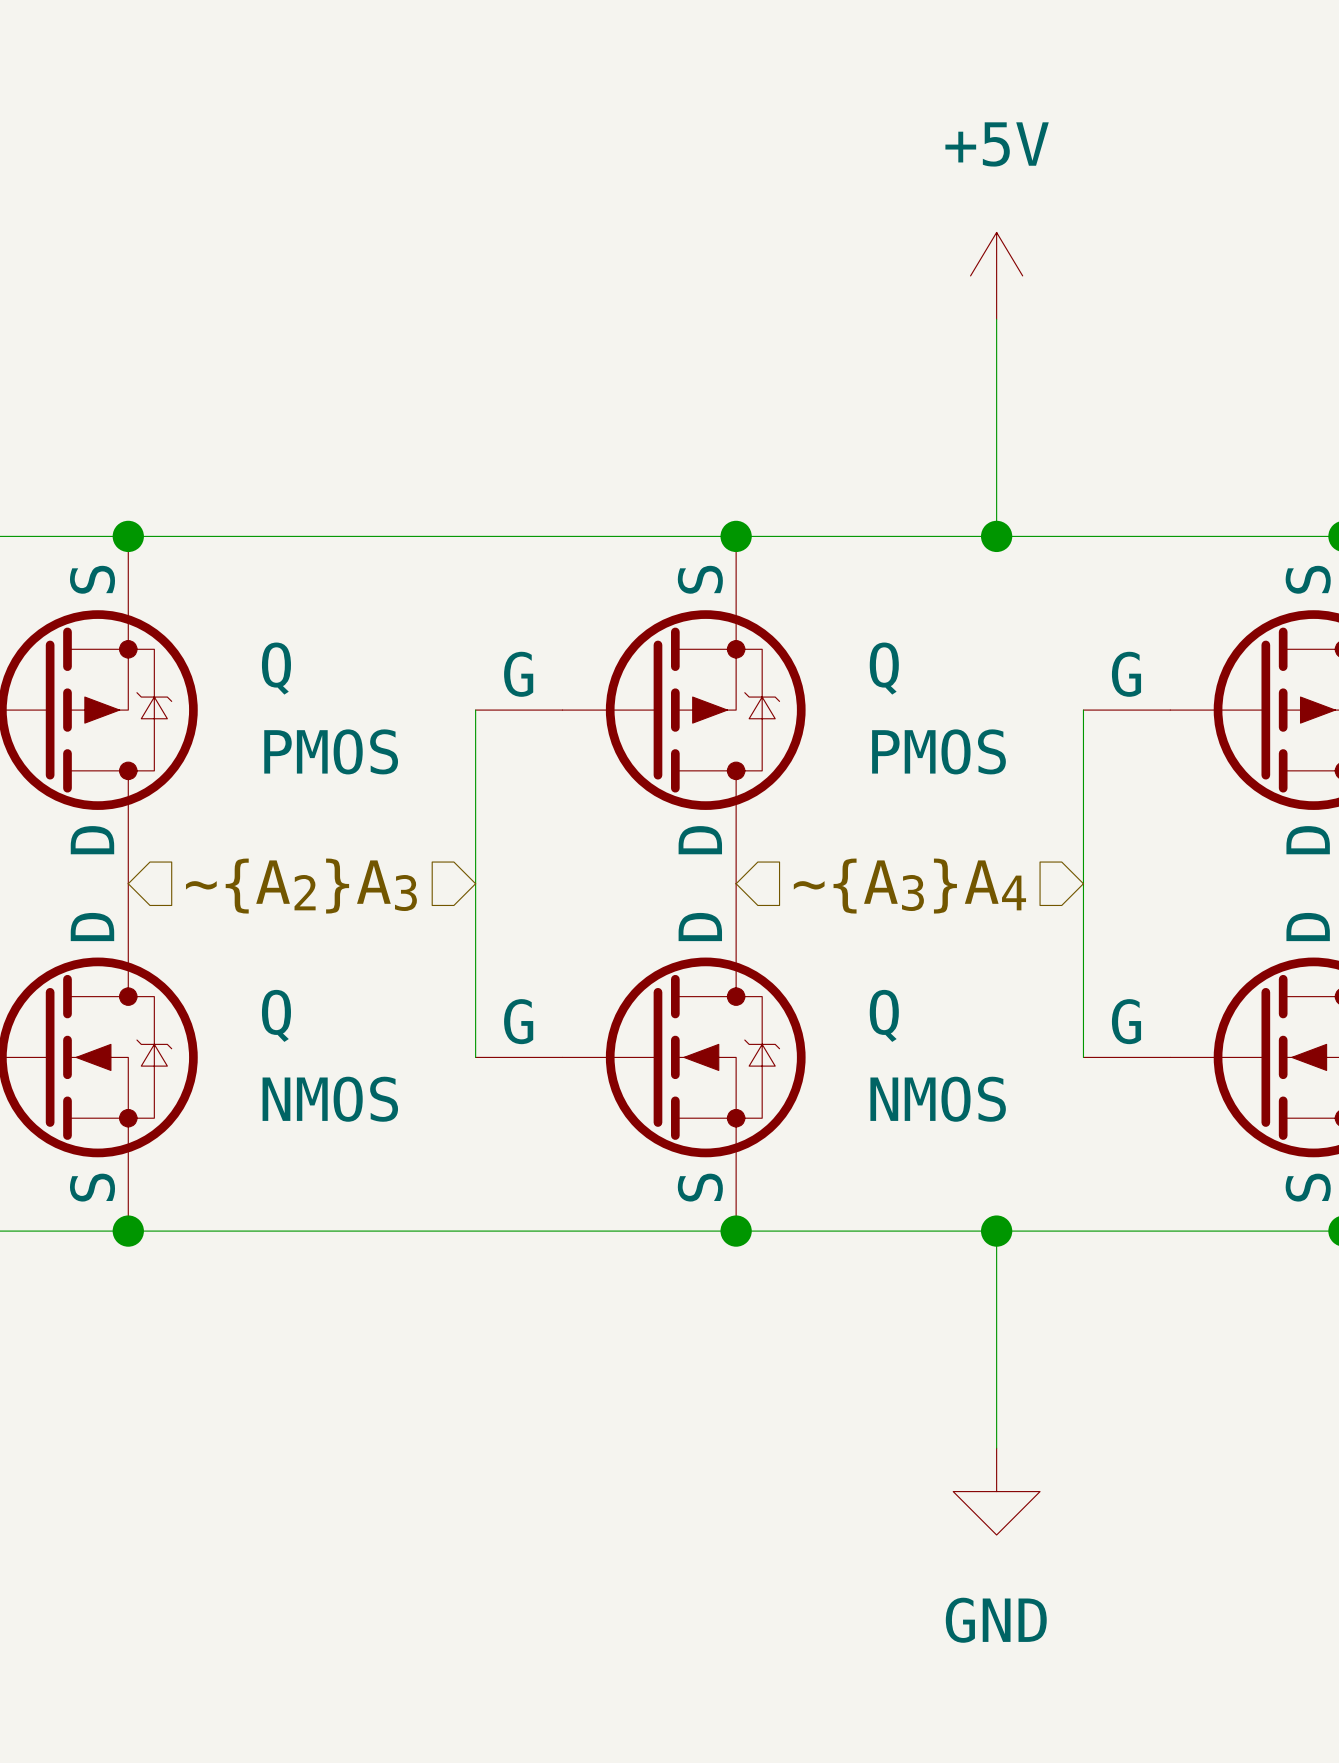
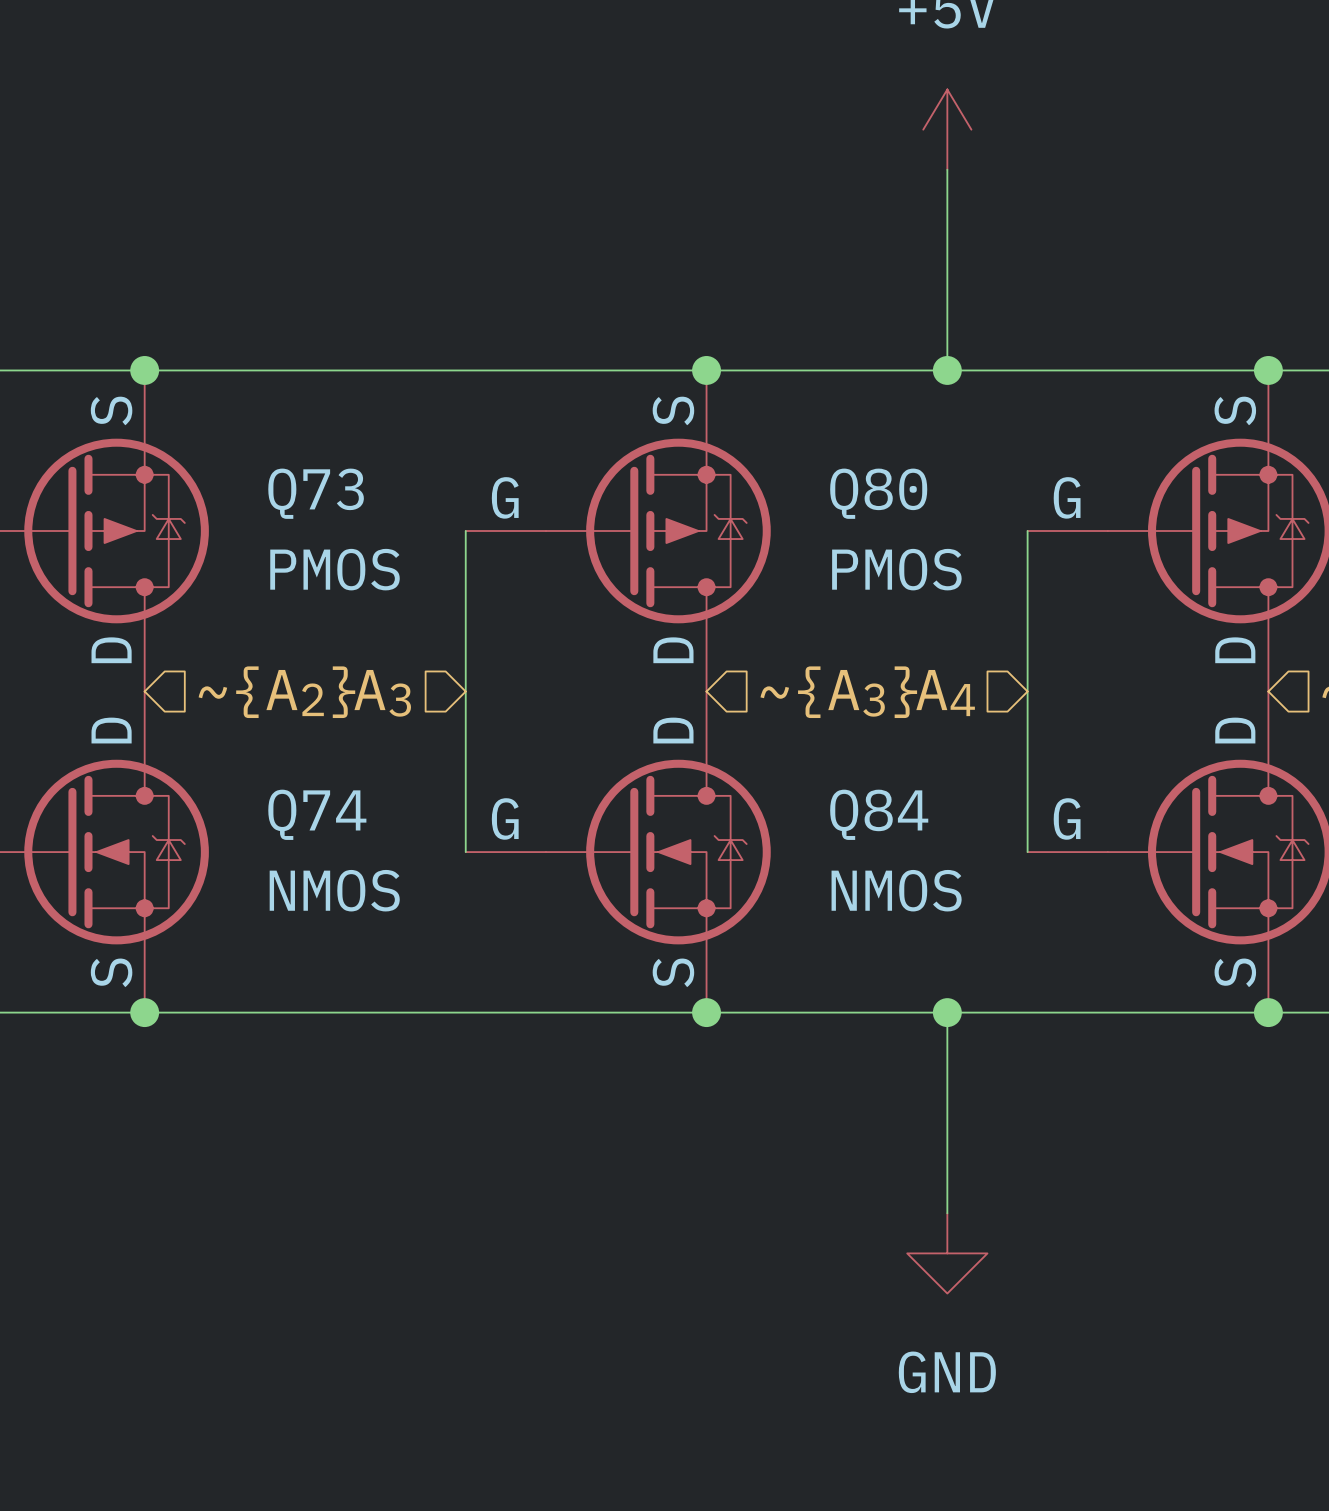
Q name: Q (276, 668) -> Q73 (316, 493)
Q name: Q (884, 668) -> Q80 (878, 493)
Q name: Q (276, 1015) -> Q74 (317, 814)
Q name: Q (884, 1015) -> Q84 (879, 814)

